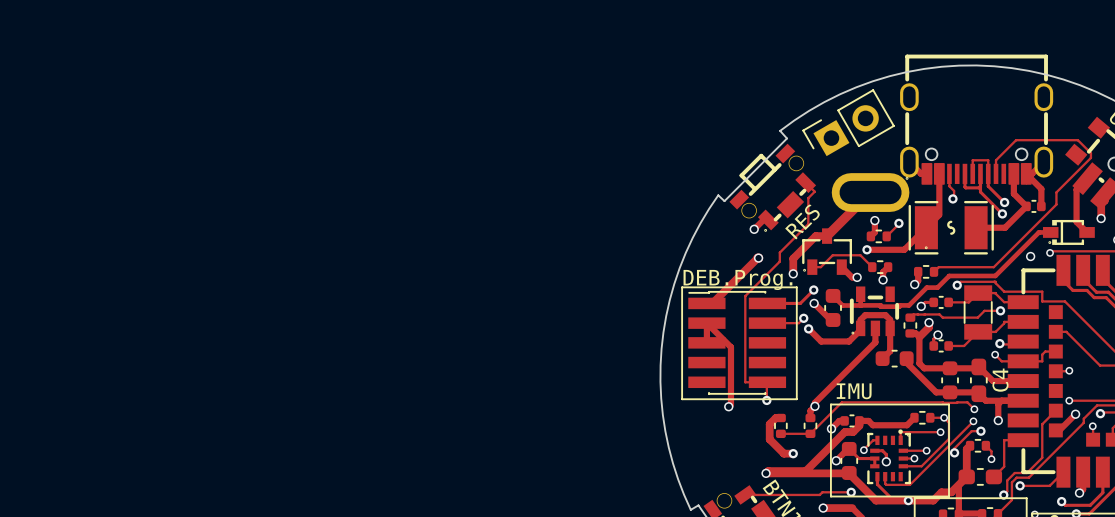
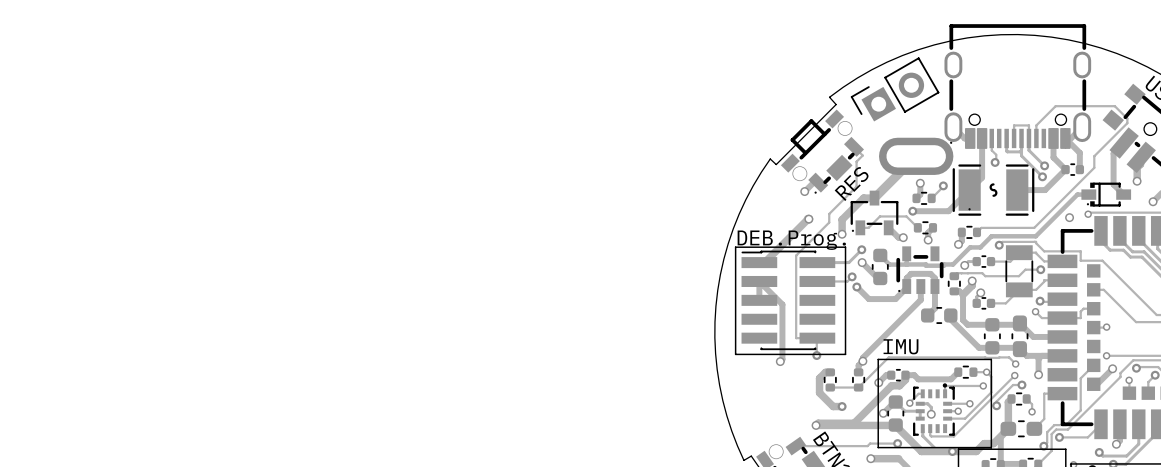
C4 name: C4 (1000, 380) -> none

